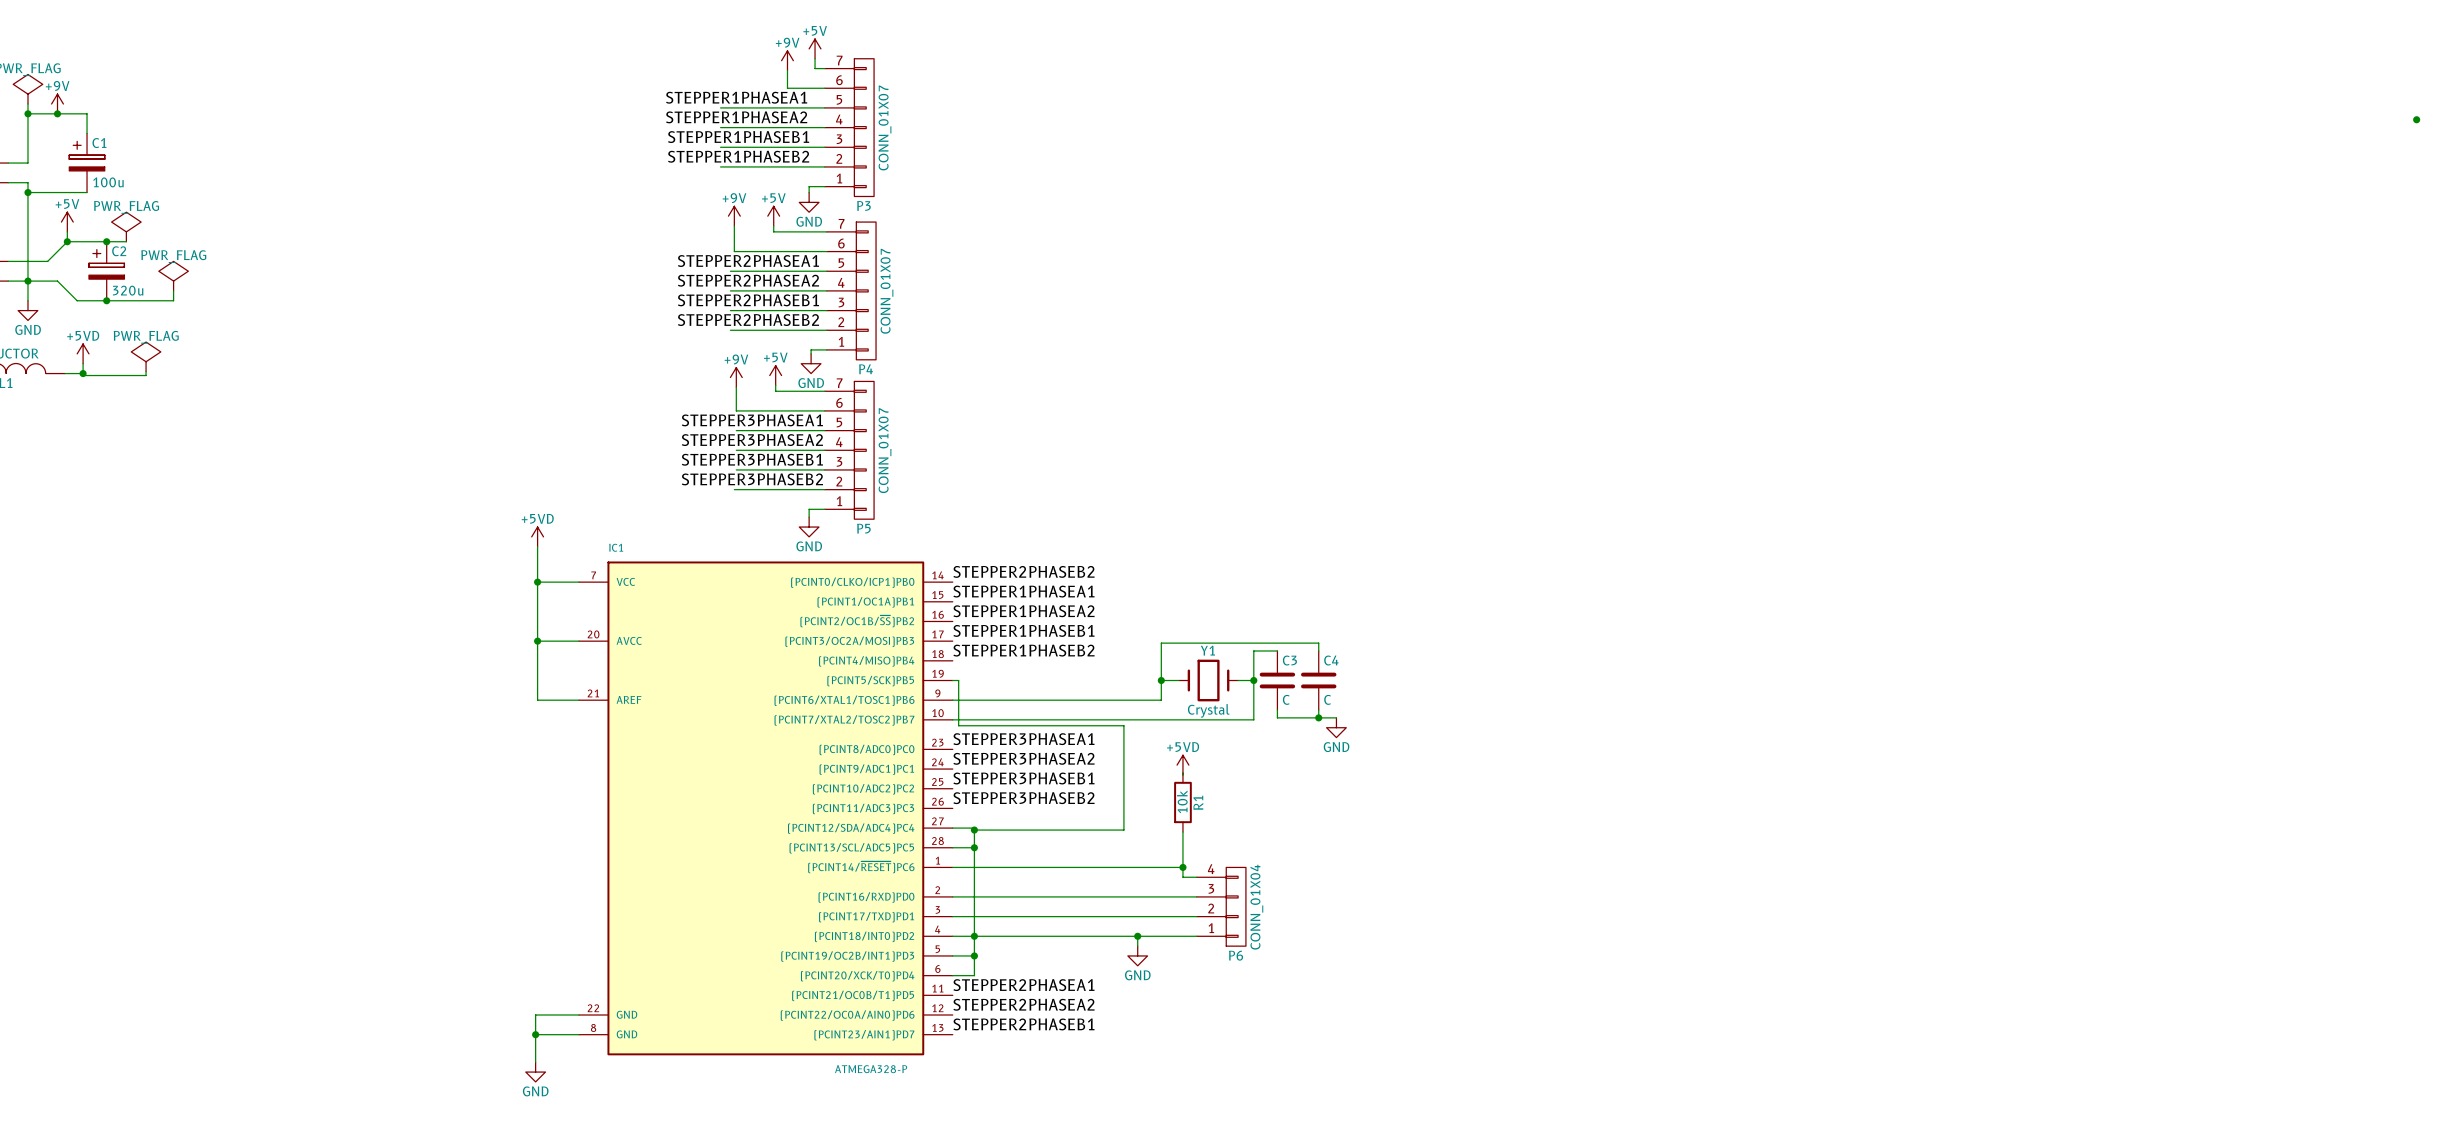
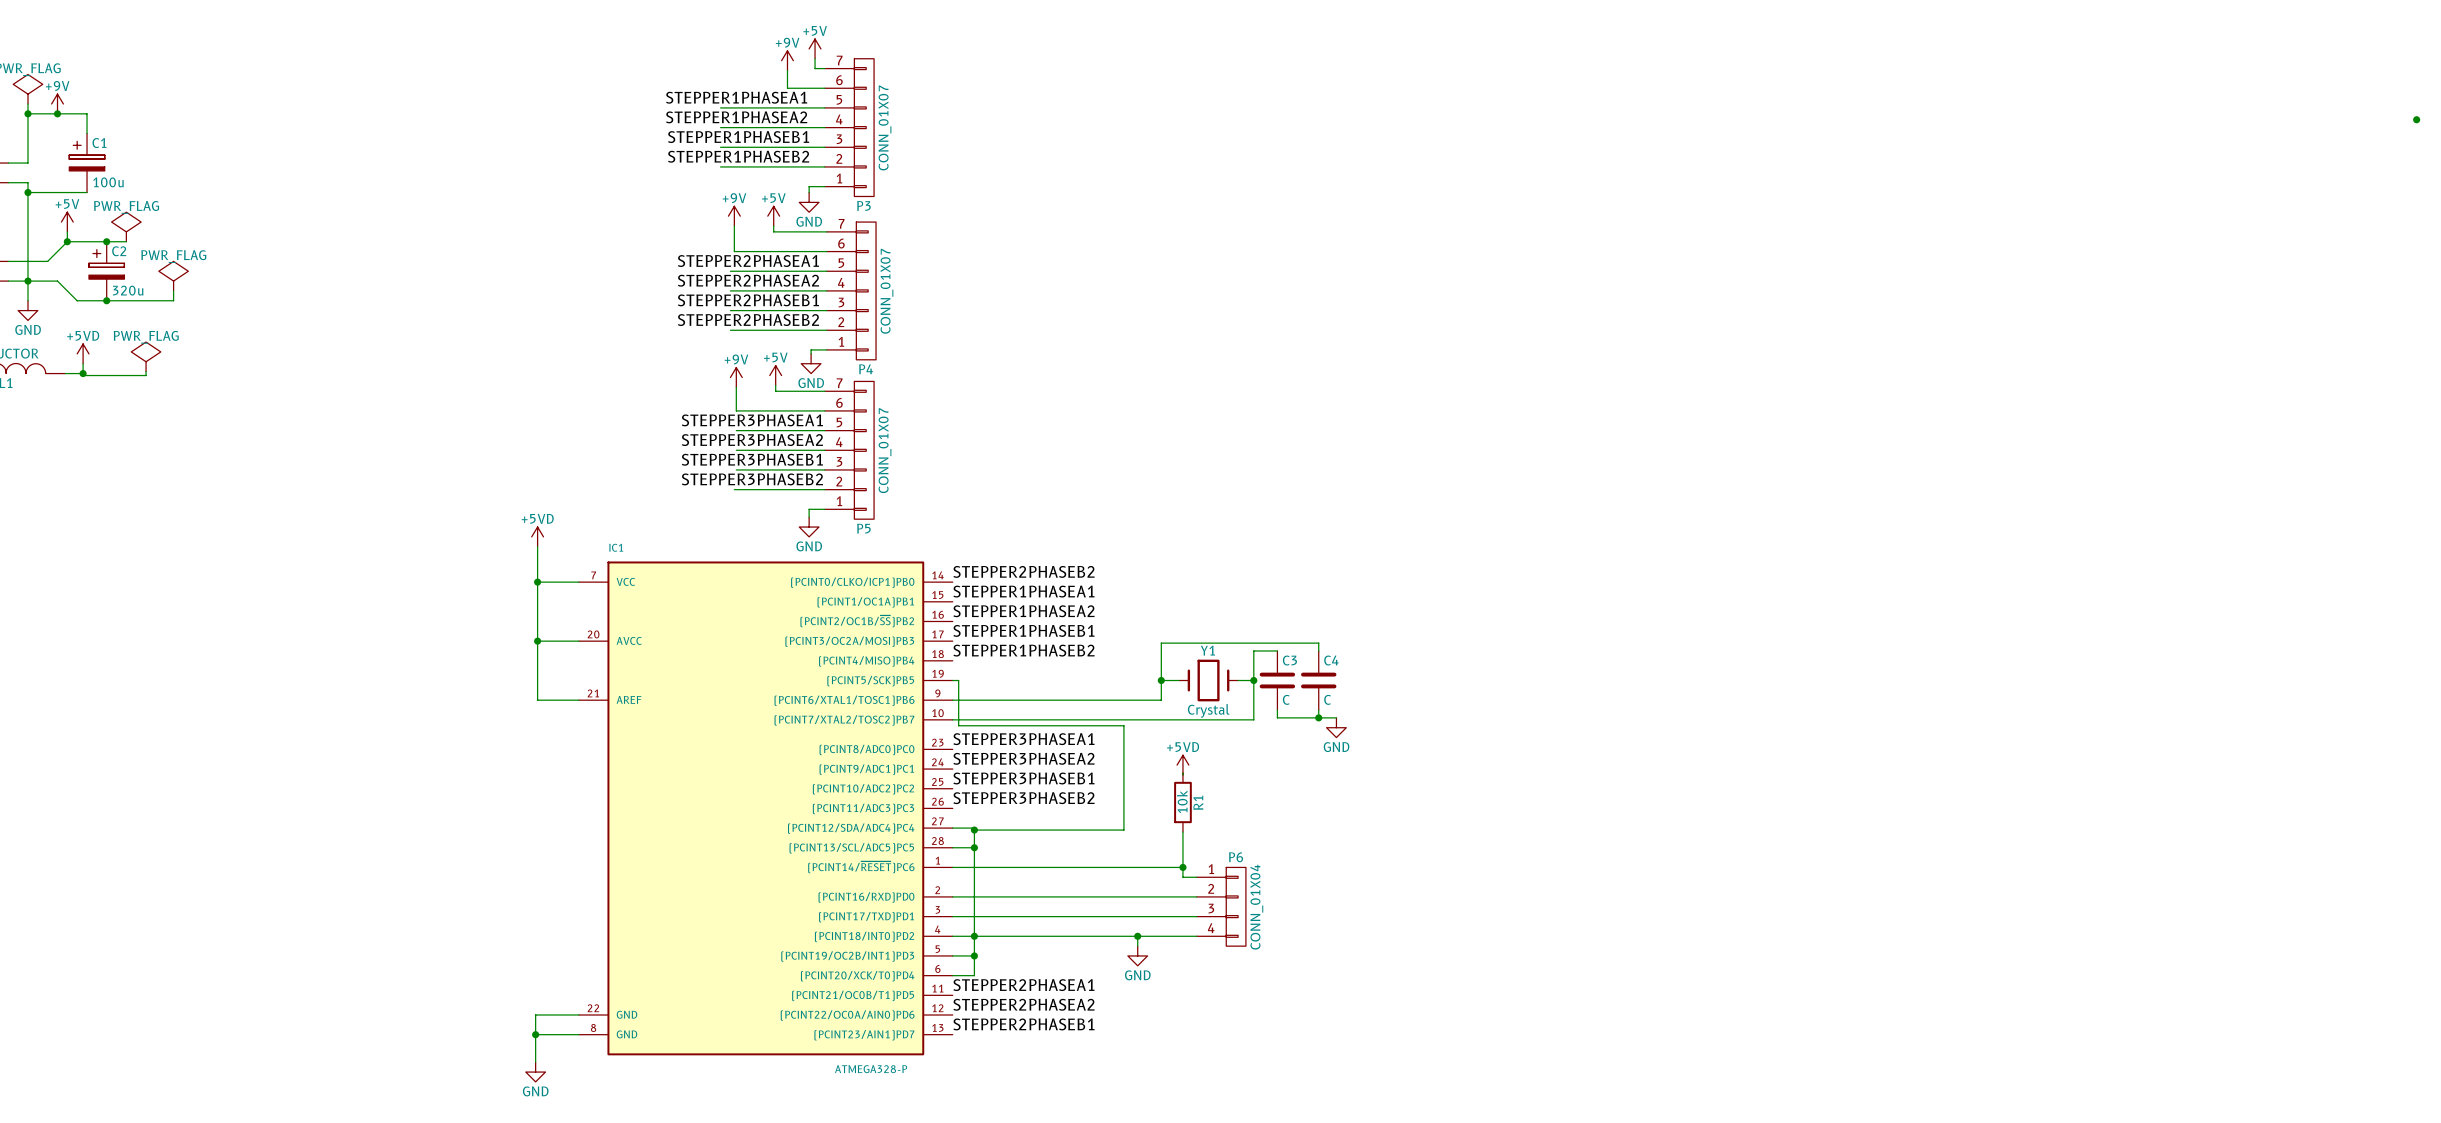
P6 flip: as is (1236, 906) -> up-down (1236, 906)

